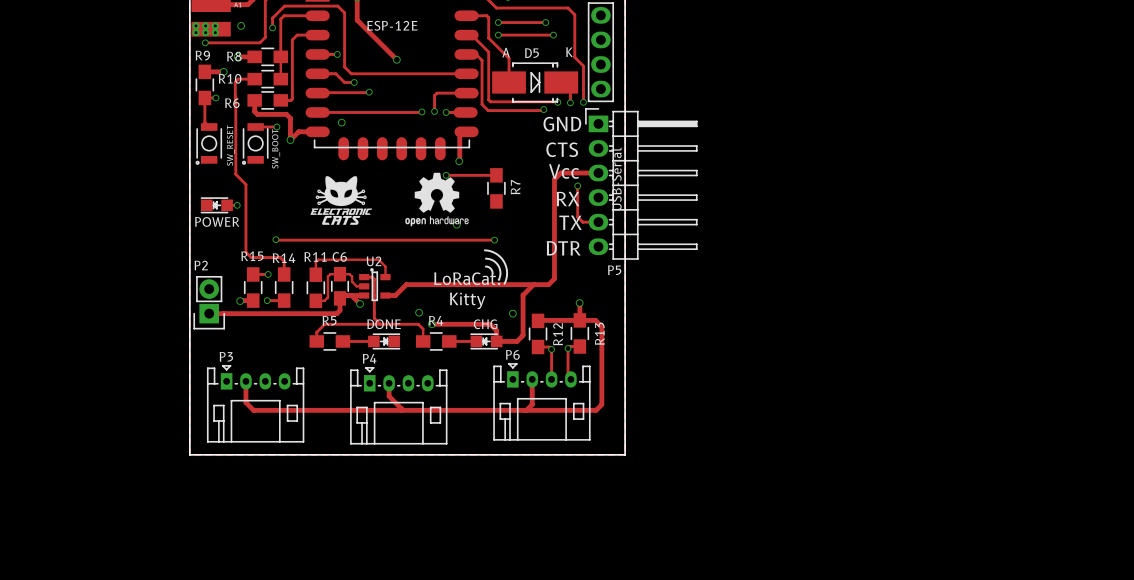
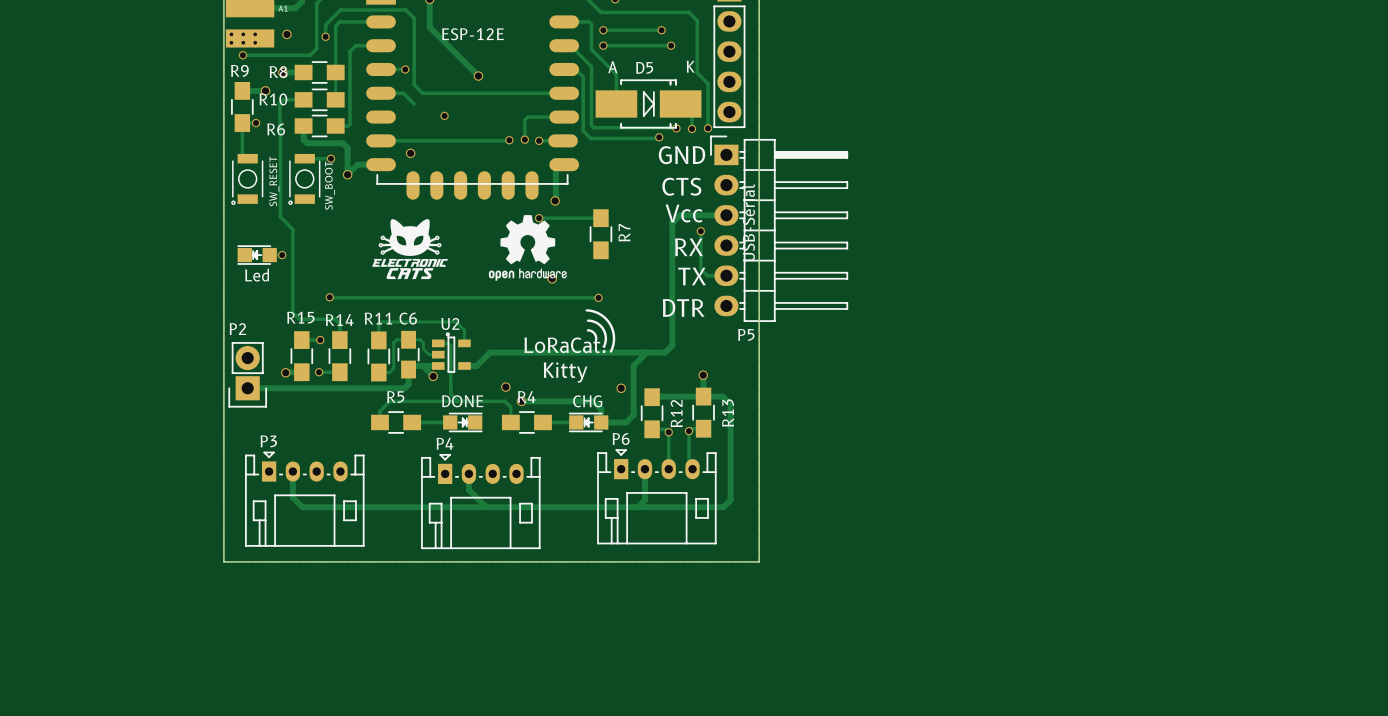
track: (344, 82) (354, 82) -> none
via: (354, 82) -> none
track: (324, 92) (368, 92) -> none
part value: POWER (217, 221) -> Led (257, 275)

